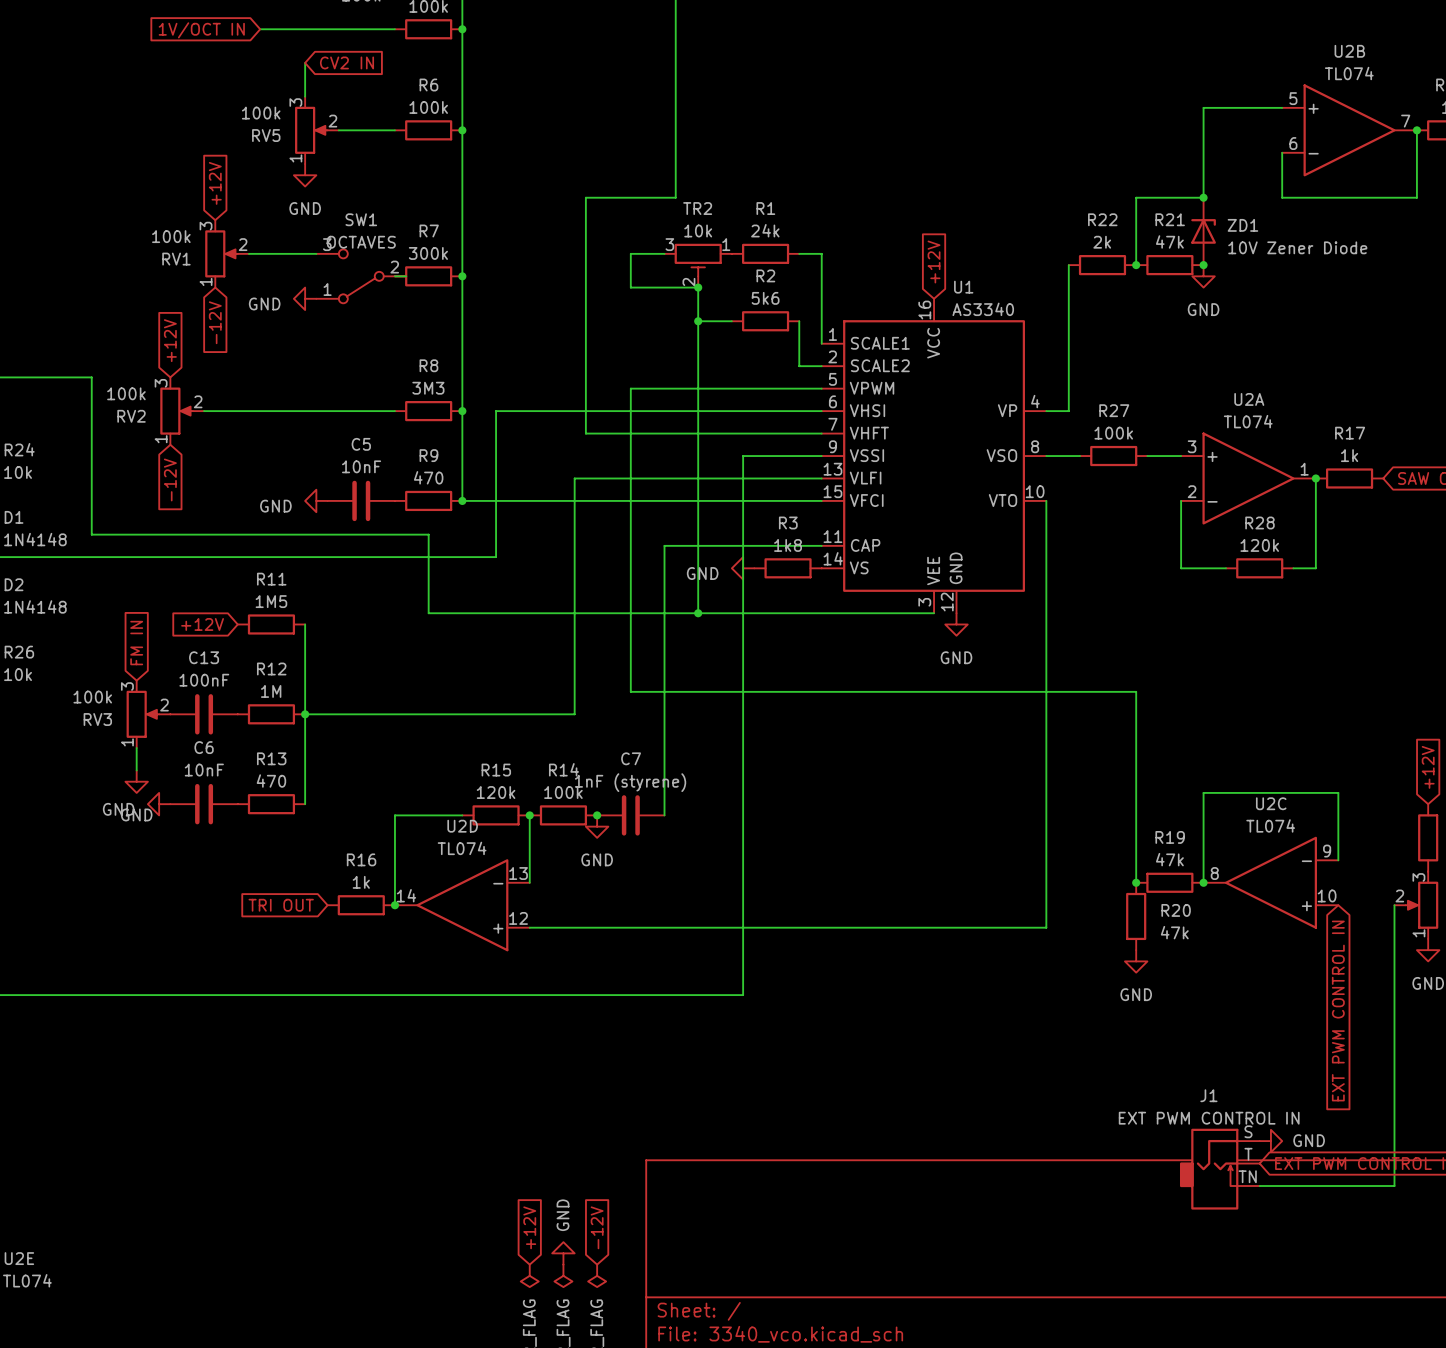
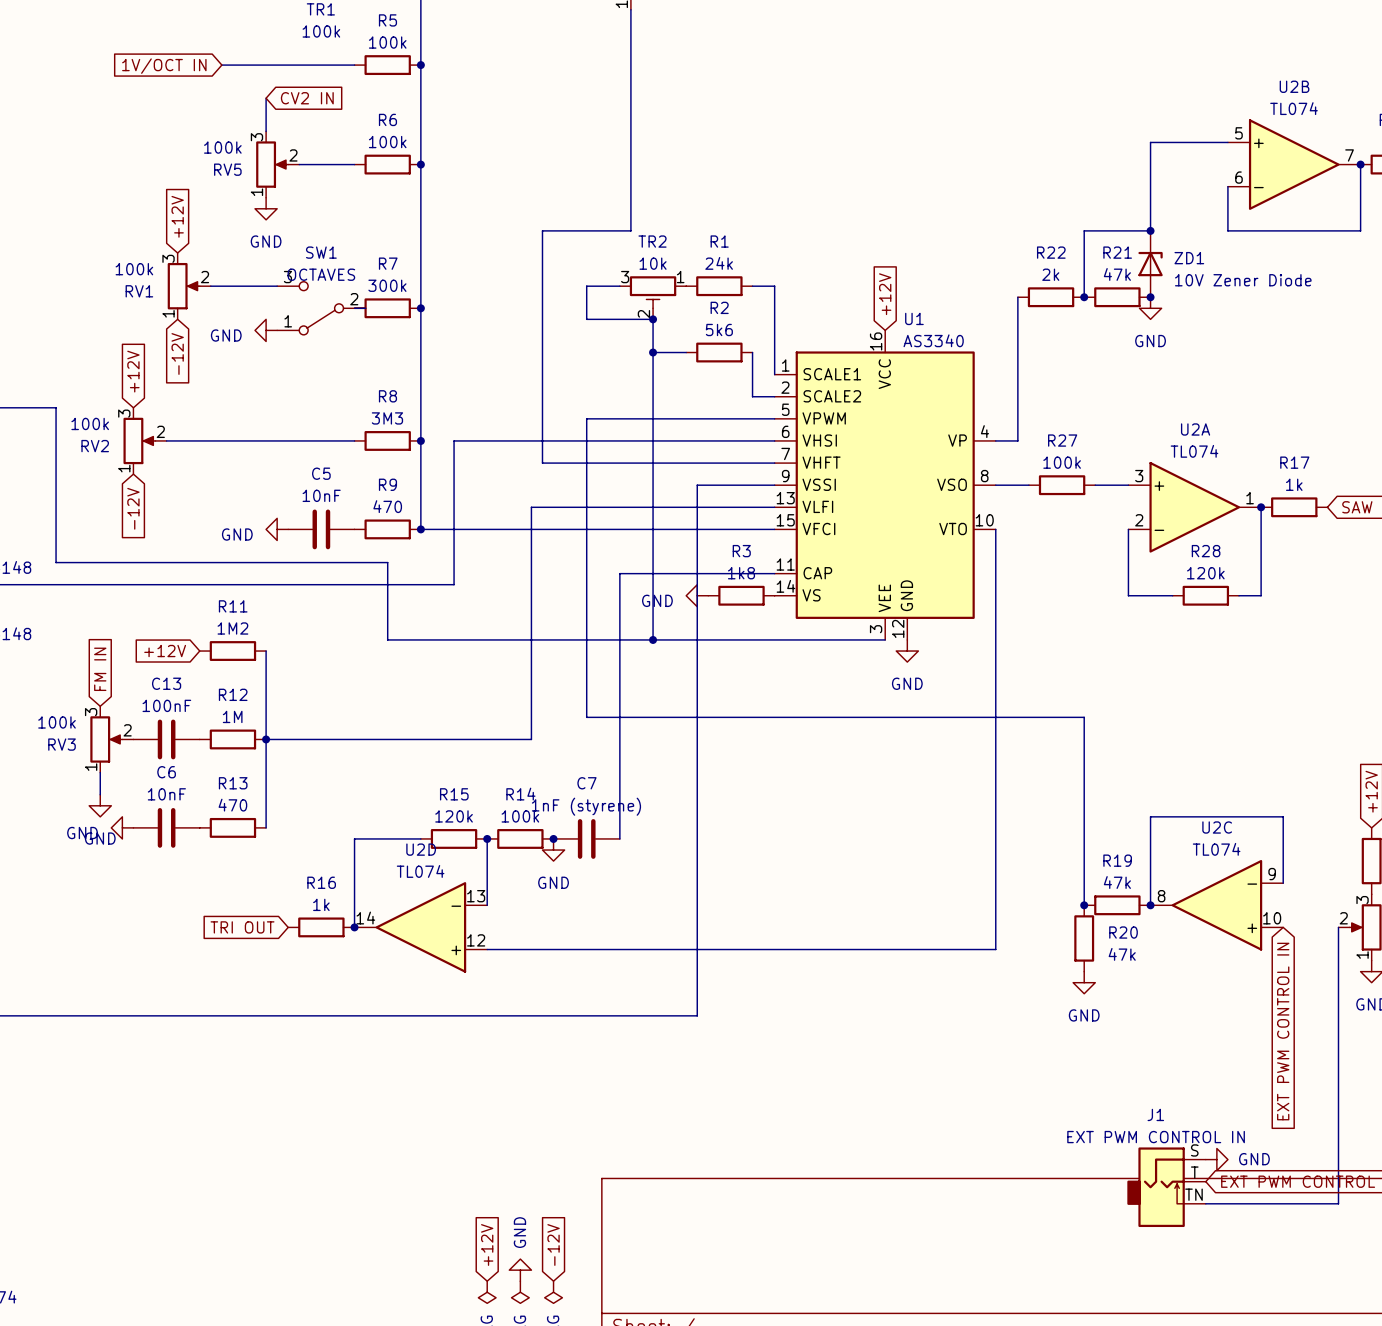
R11 value: 1M5 (271, 601) -> 1M2 (232, 628)

